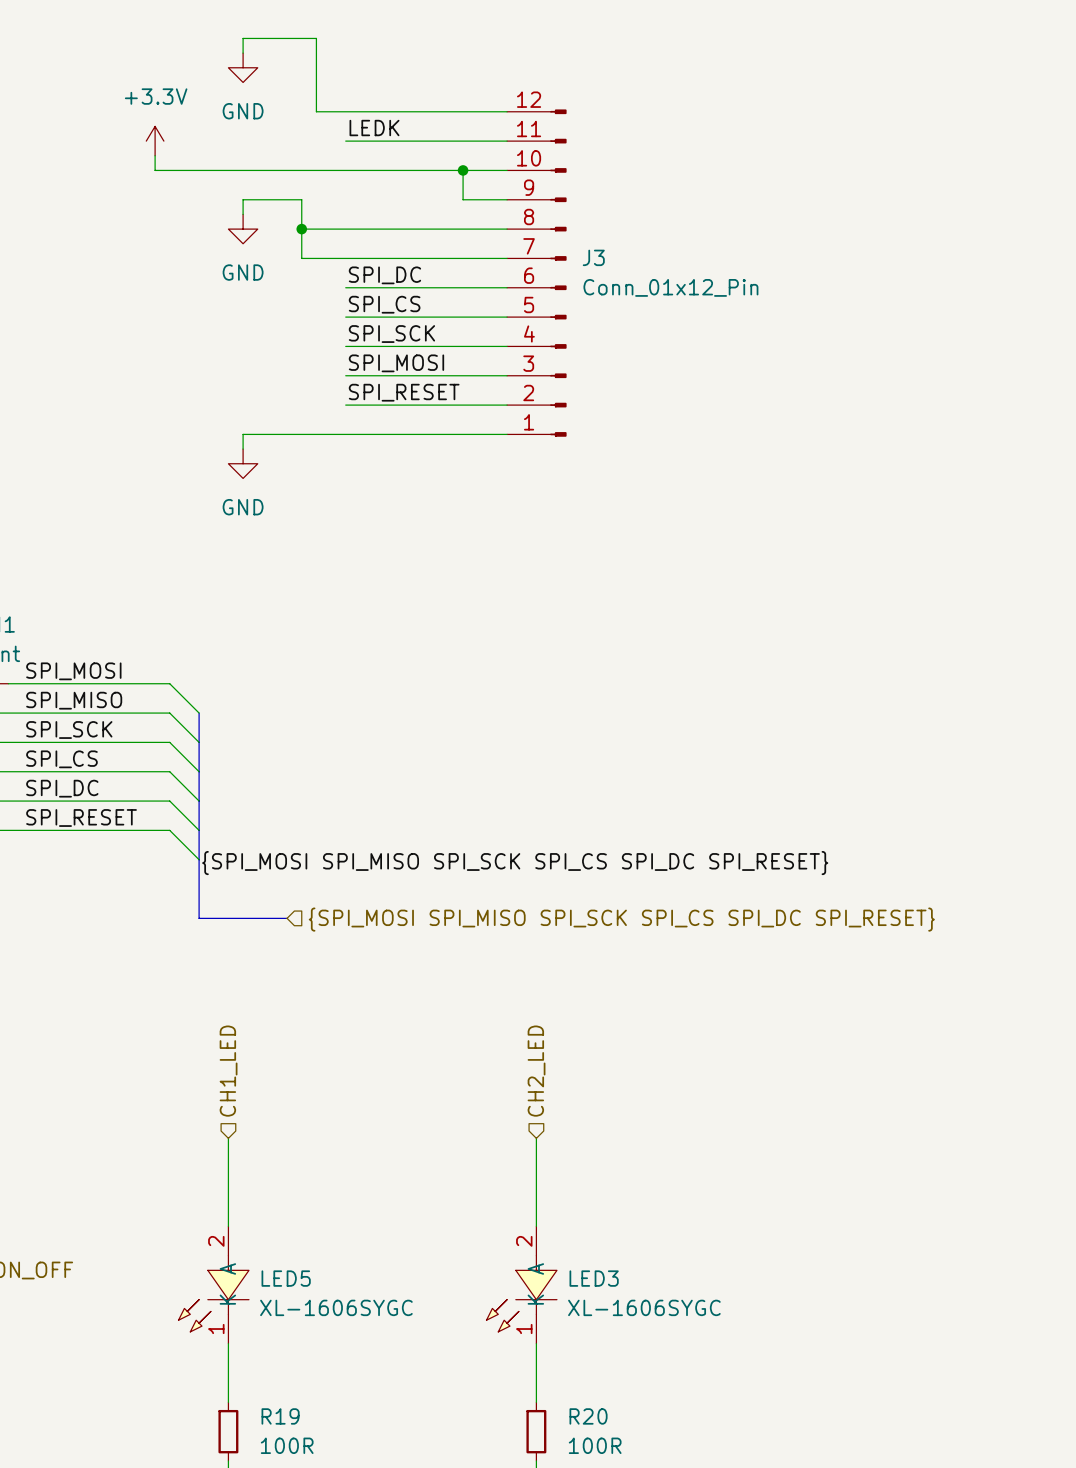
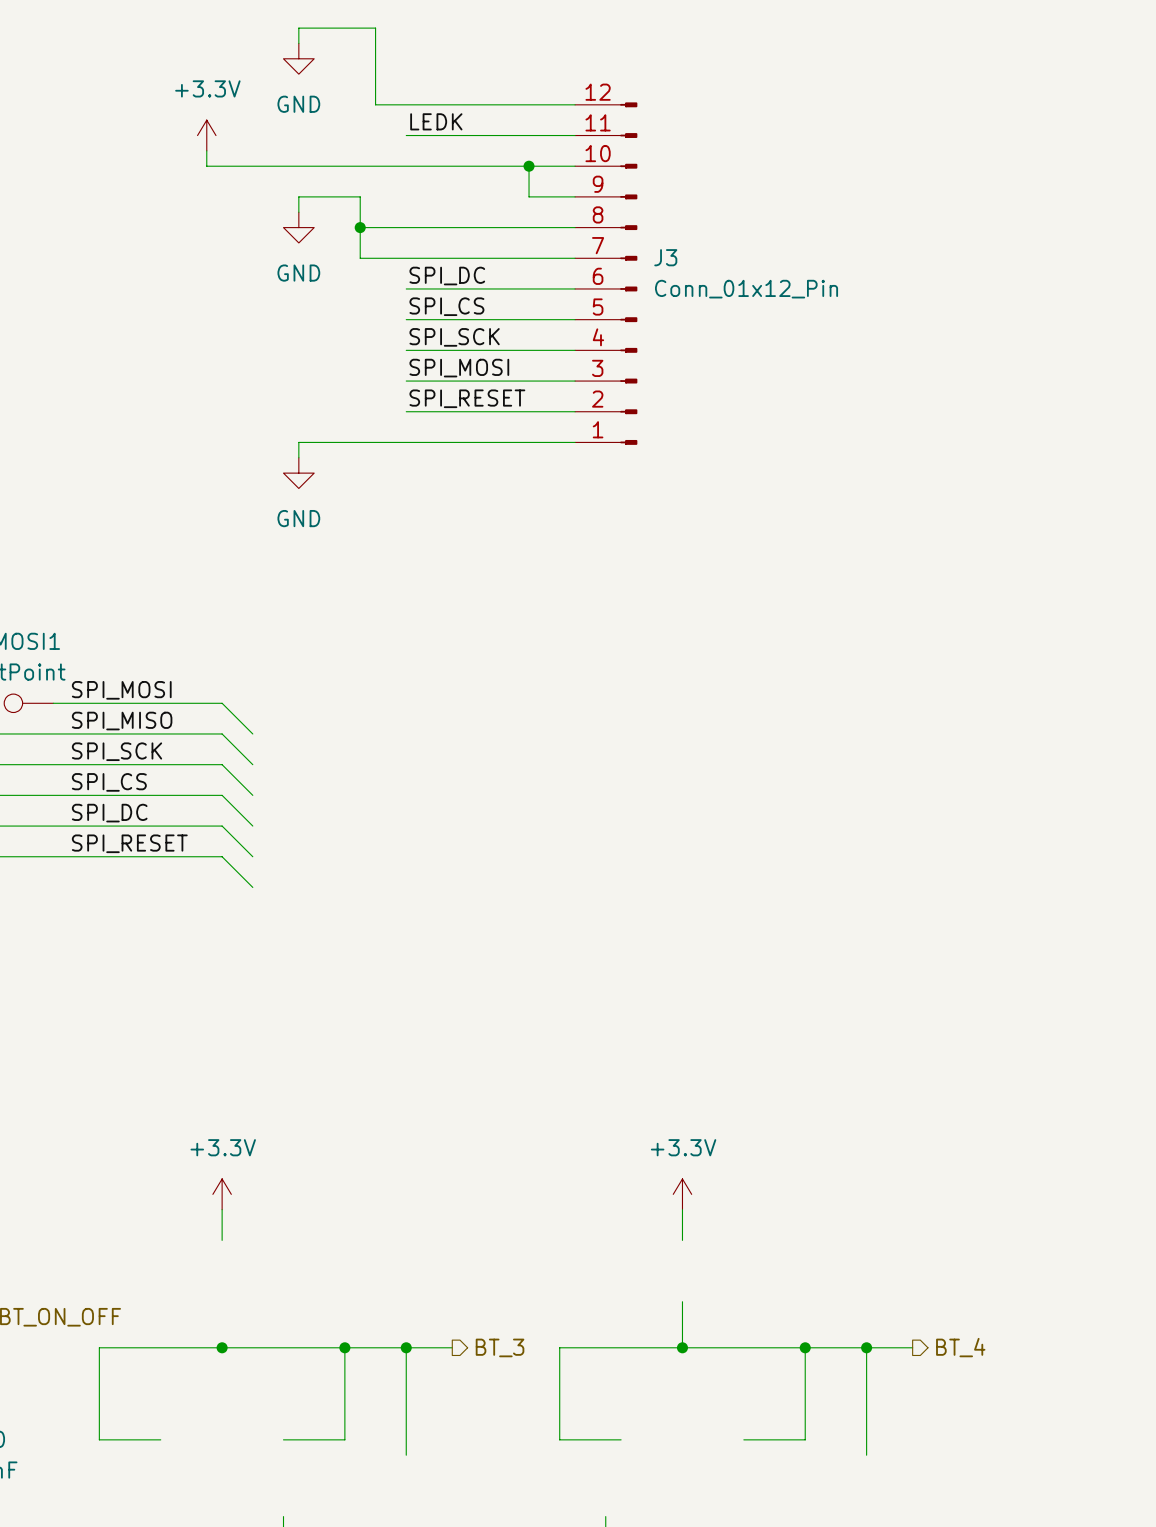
bus: (199, 713) (199, 918) (287, 918) -> none
label: {SPI_MOSI SPI_MISO SPI_SCK SPI_CS SPI_DC SPI_RESET} (515, 863) -> none
hierarchical label: {SPI_MOSI SPI_MISO SPI_SCK SPI_CS SPI_DC SPI_RESET} (621, 919) -> none
hierarchical label: CH1_LED (228, 1071) -> none
hierarchical label: CH2_LED (536, 1071) -> none
wire: (228, 1138) (228, 1226) -> none
wire: (536, 1138) (536, 1226) -> none
power symbol: none -> +3.3V (222, 1194)
power symbol: none -> +3.3V (682, 1194)
wire: none -> (222, 1209) (222, 1240)
wire: none -> (682, 1209) (682, 1240)
wire: none -> (682, 1301) (682, 1347)
LED5: XL-1606SYGC (213, 1285) -> none
LED3: XL-1606SYGC (521, 1285) -> none
junction: none -> (222, 1347)
wire: none -> (344, 1347) (344, 1439) (283, 1439)
junction: none -> (344, 1347)
wire: none -> (406, 1347) (406, 1455)
junction: none -> (406, 1347)
wire: none -> (452, 1347) (99, 1347) (99, 1439) (160, 1439)
hierarchical label: none -> BT_3 (500, 1347)
junction: none -> (682, 1347)
wire: none -> (805, 1347) (805, 1439) (743, 1439)
junction: none -> (805, 1347)
wire: none -> (866, 1347) (866, 1455)
junction: none -> (866, 1347)
wire: none -> (912, 1347) (559, 1347) (559, 1439) (621, 1439)
hierarchical label: none -> BT_4 (960, 1347)
wire: (228, 1343) (228, 1402) -> none
wire: (536, 1343) (536, 1402) -> none
R19: 100R (228, 1431) -> none
R20: 100R (536, 1431) -> none

